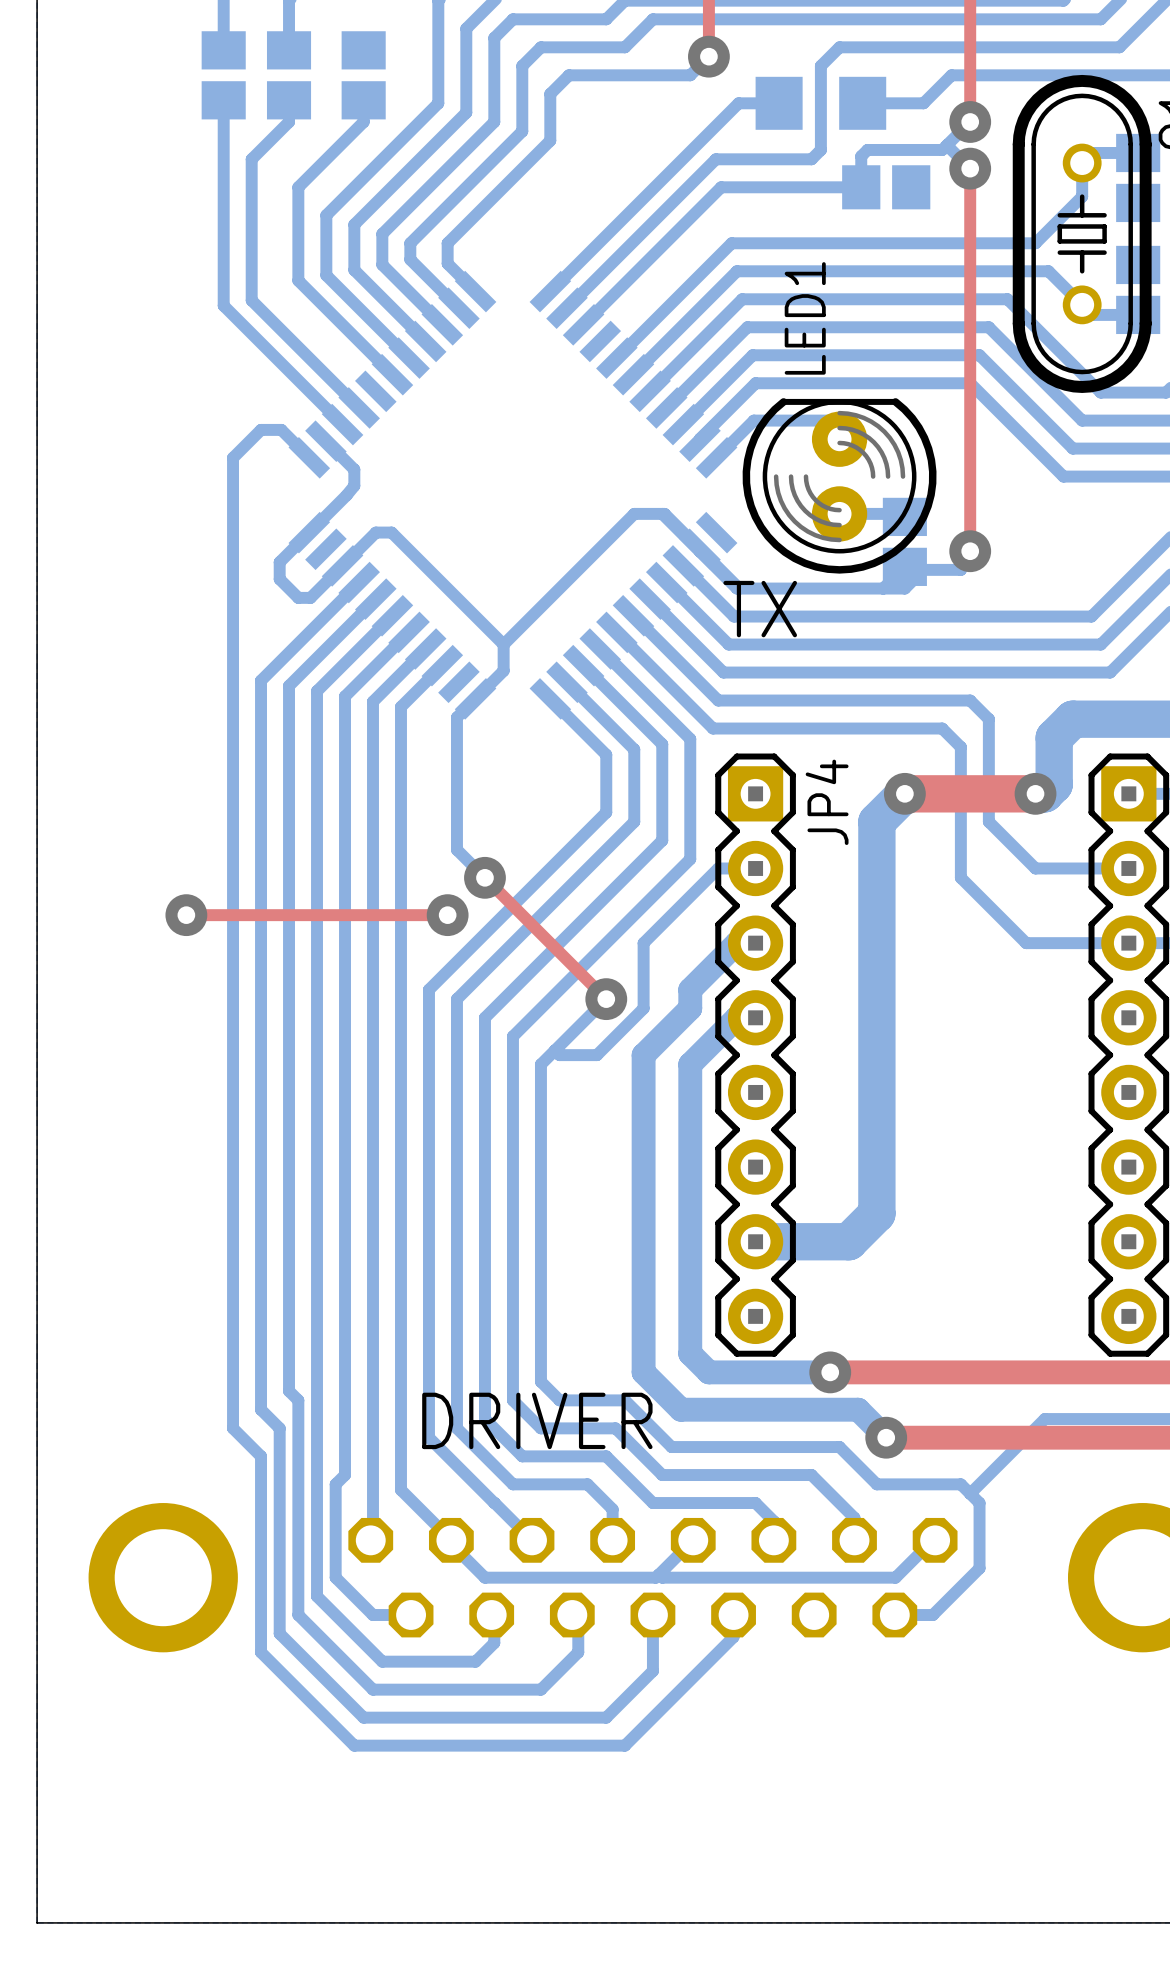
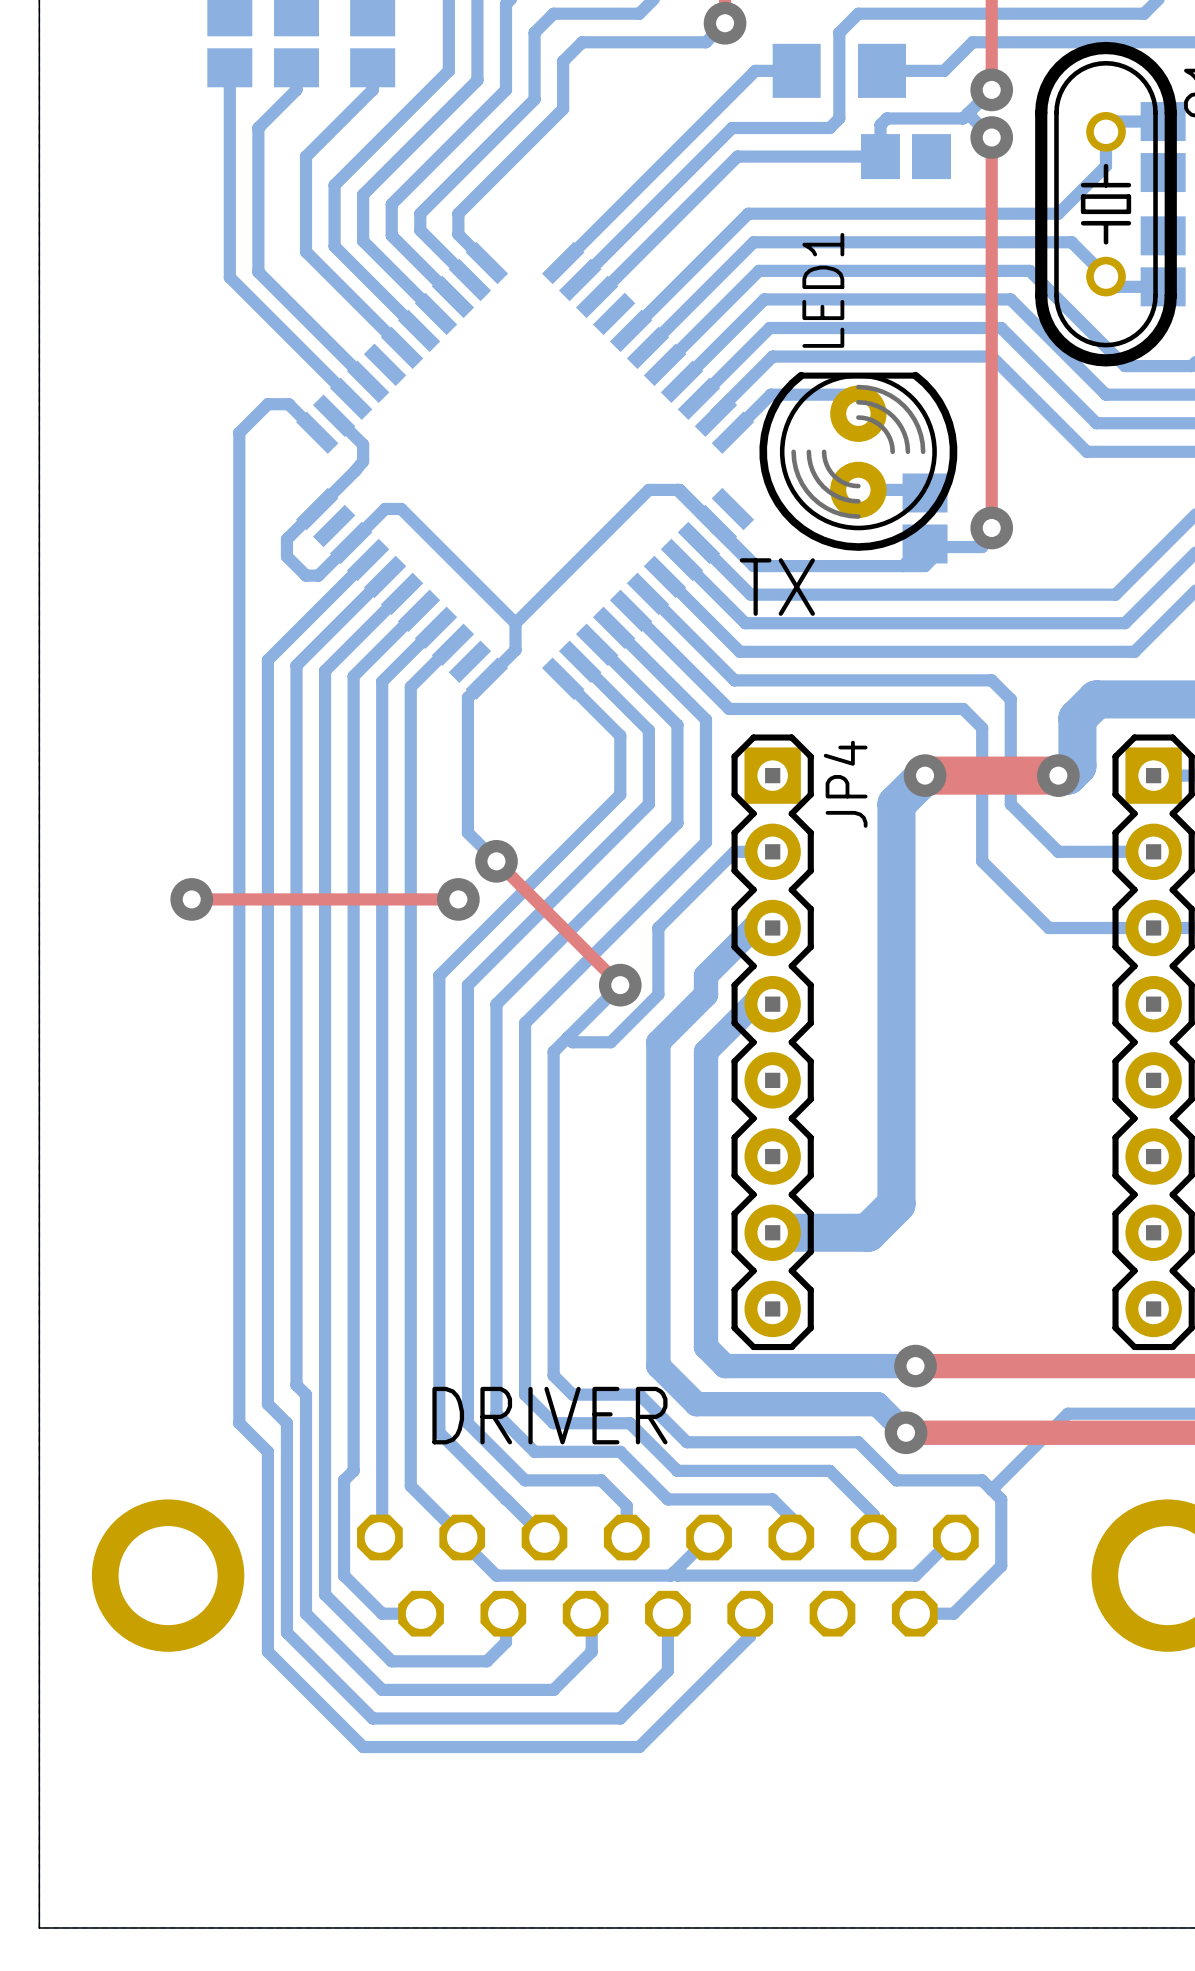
bottom track: none -> (848, 1366) (915, 1366)
top track: (830, 1372) (895, 1372) -> none
via position: (830, 1372) -> (915, 1366)

